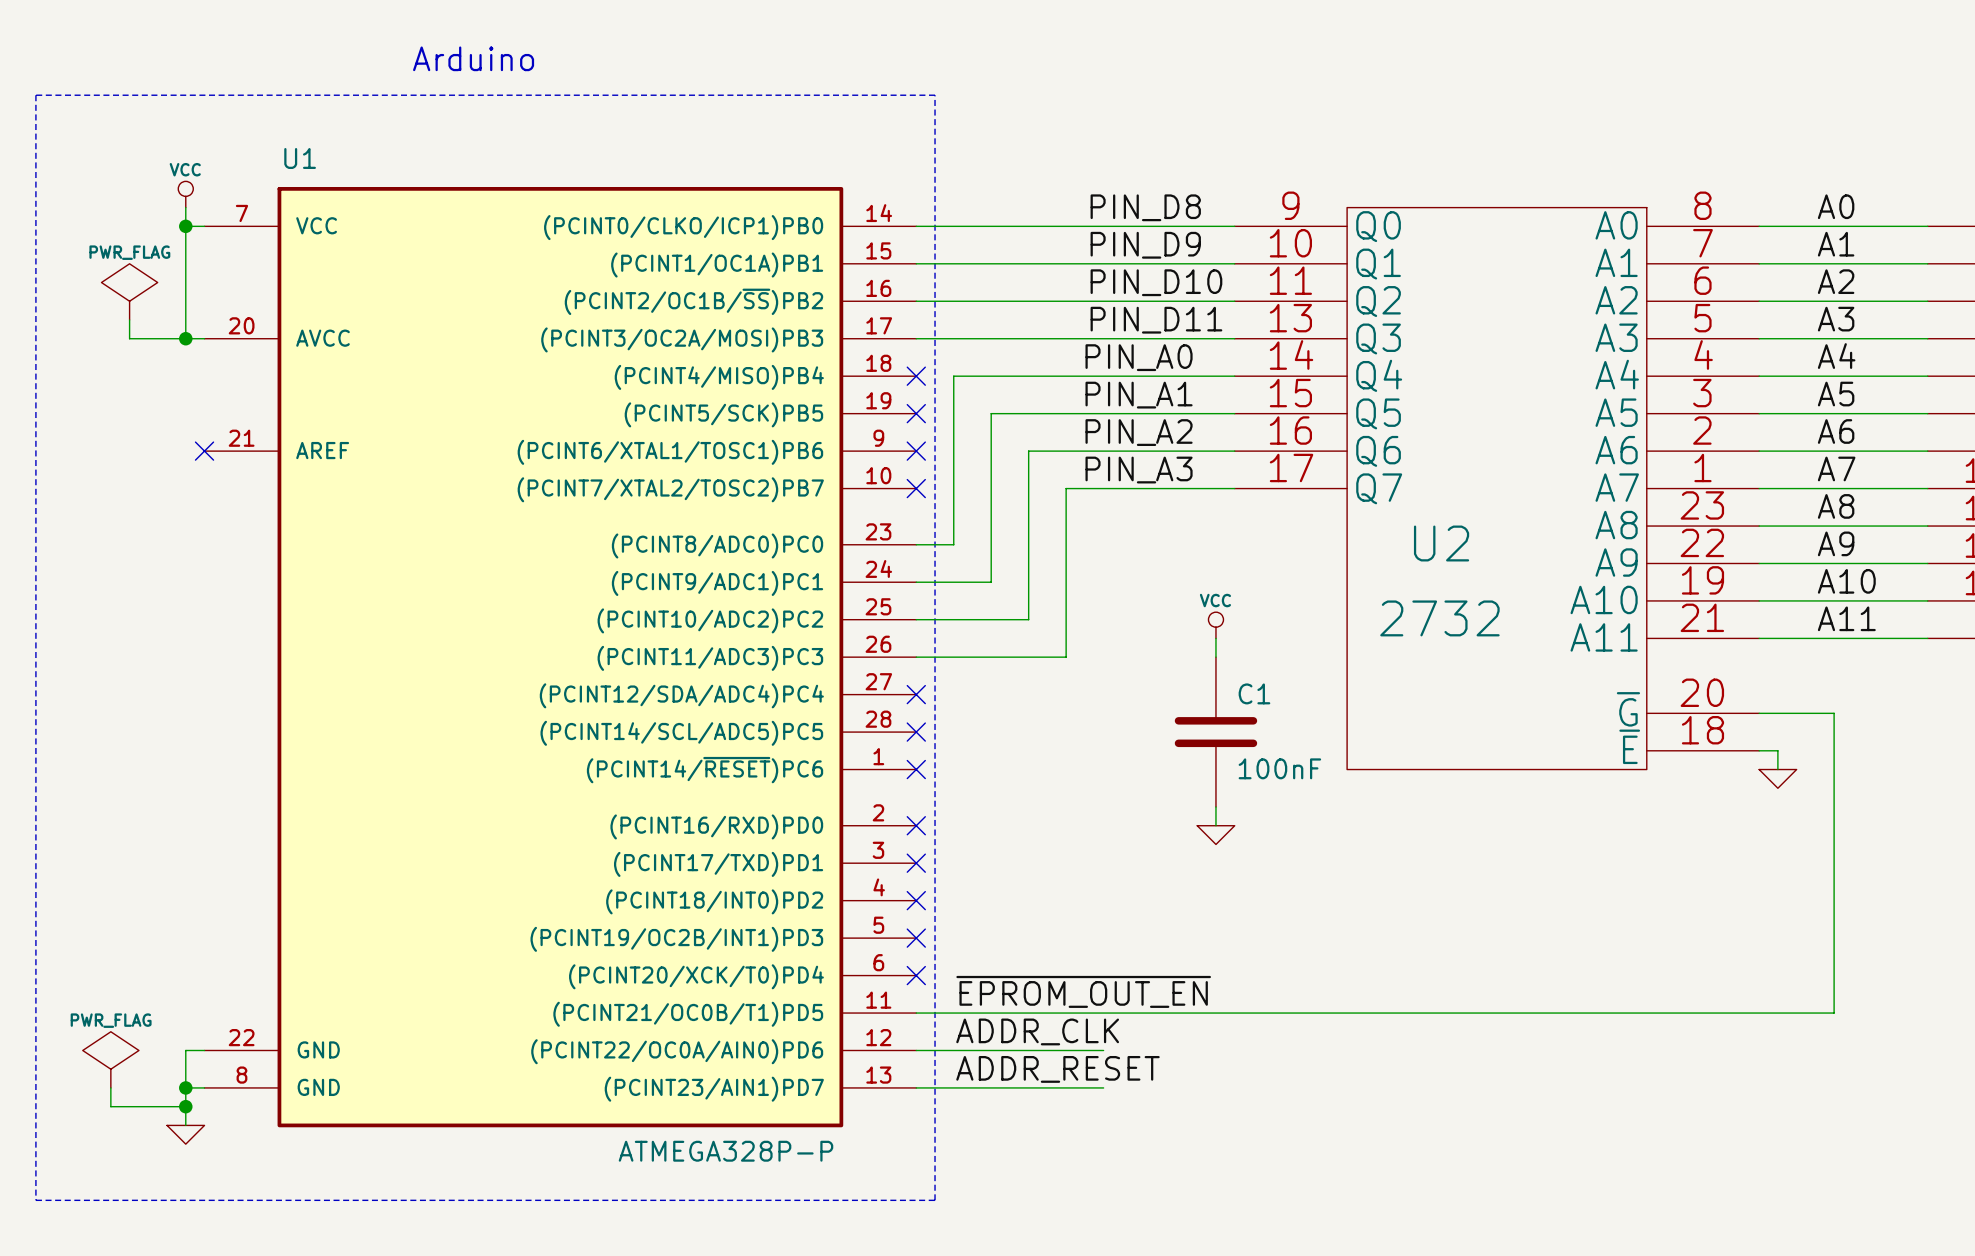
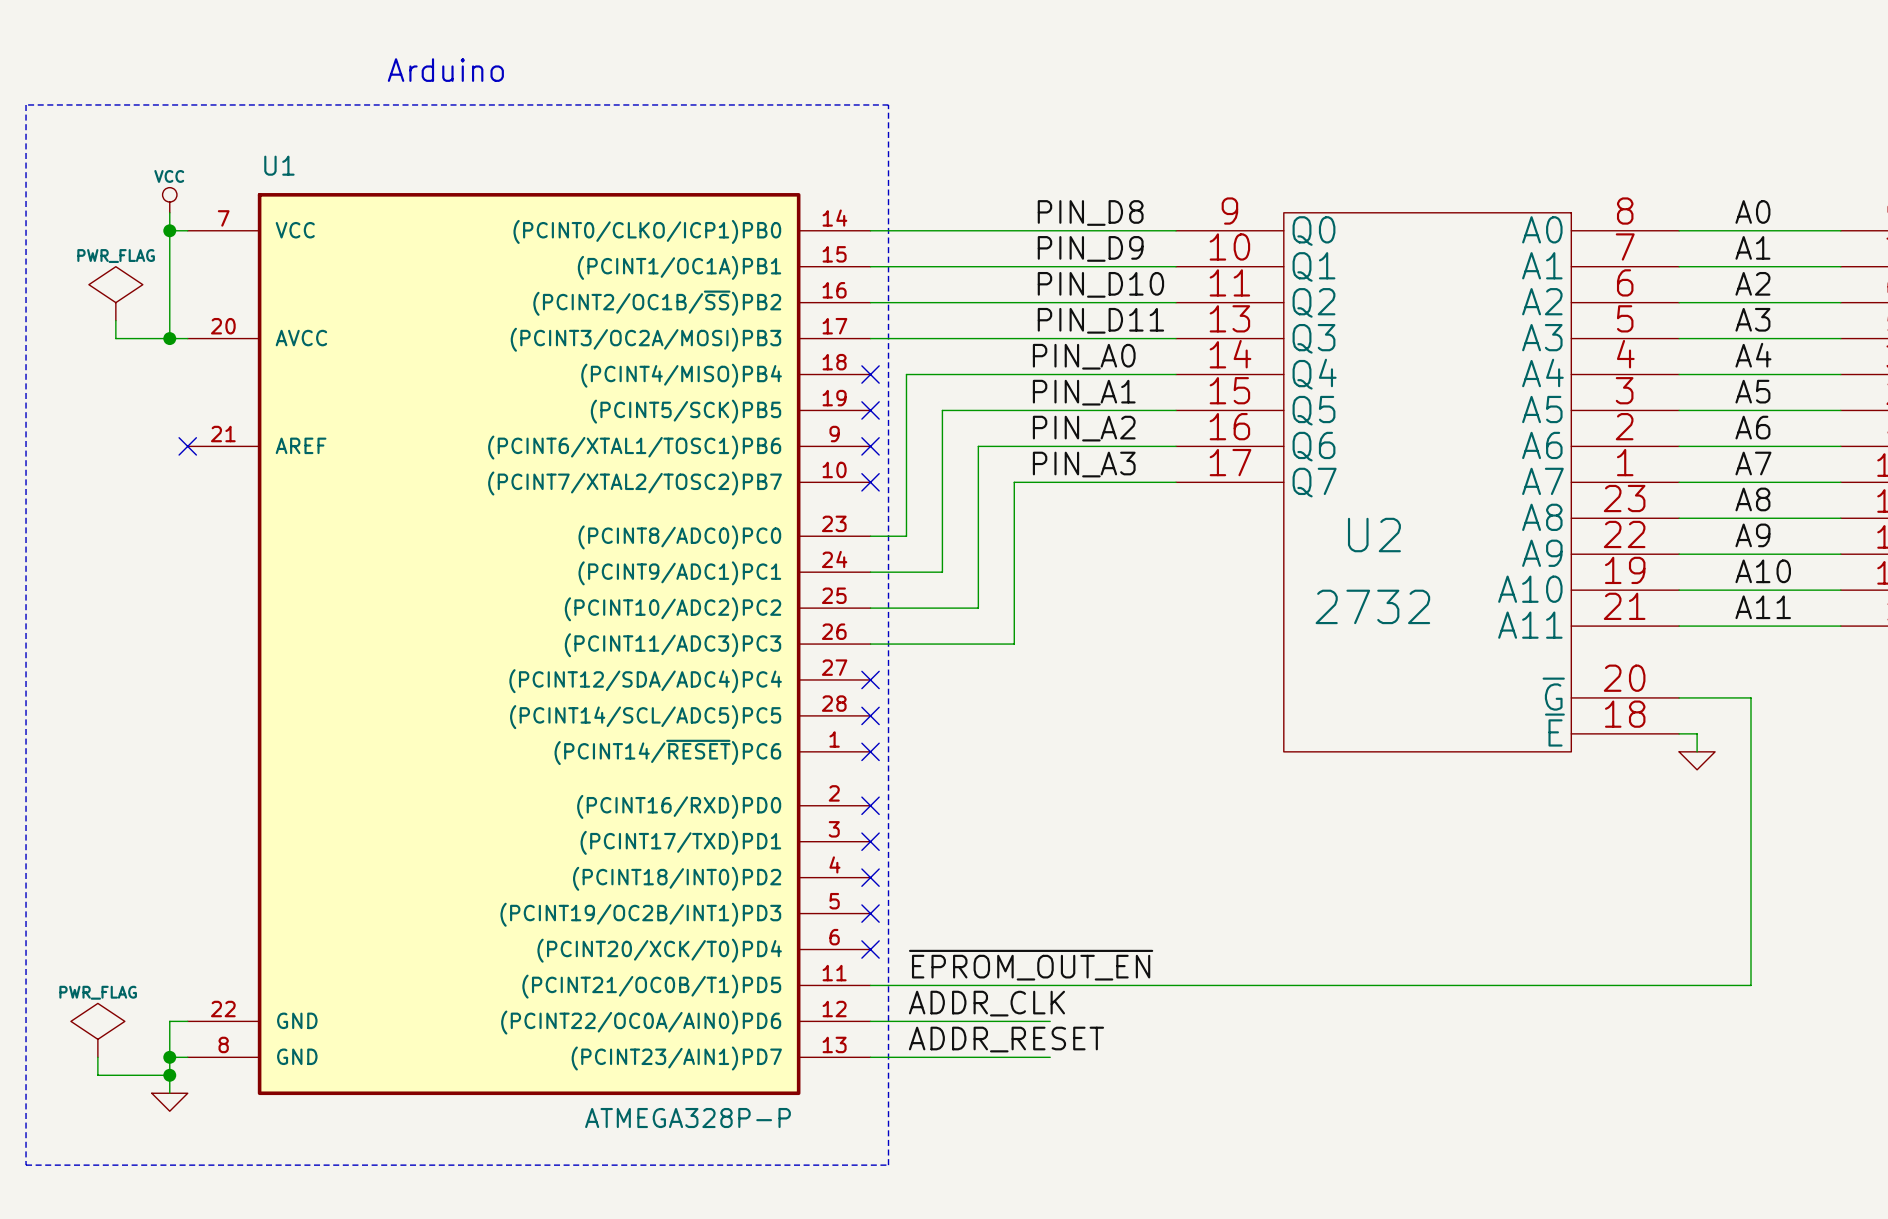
power symbol: VCC (1215, 625) -> none
wire: (1215, 638) (1215, 657) -> none
C1: 100nF (1215, 732) -> none
wire: (1215, 806) (1215, 825) -> none
power symbol: (1215, 835) -> none

